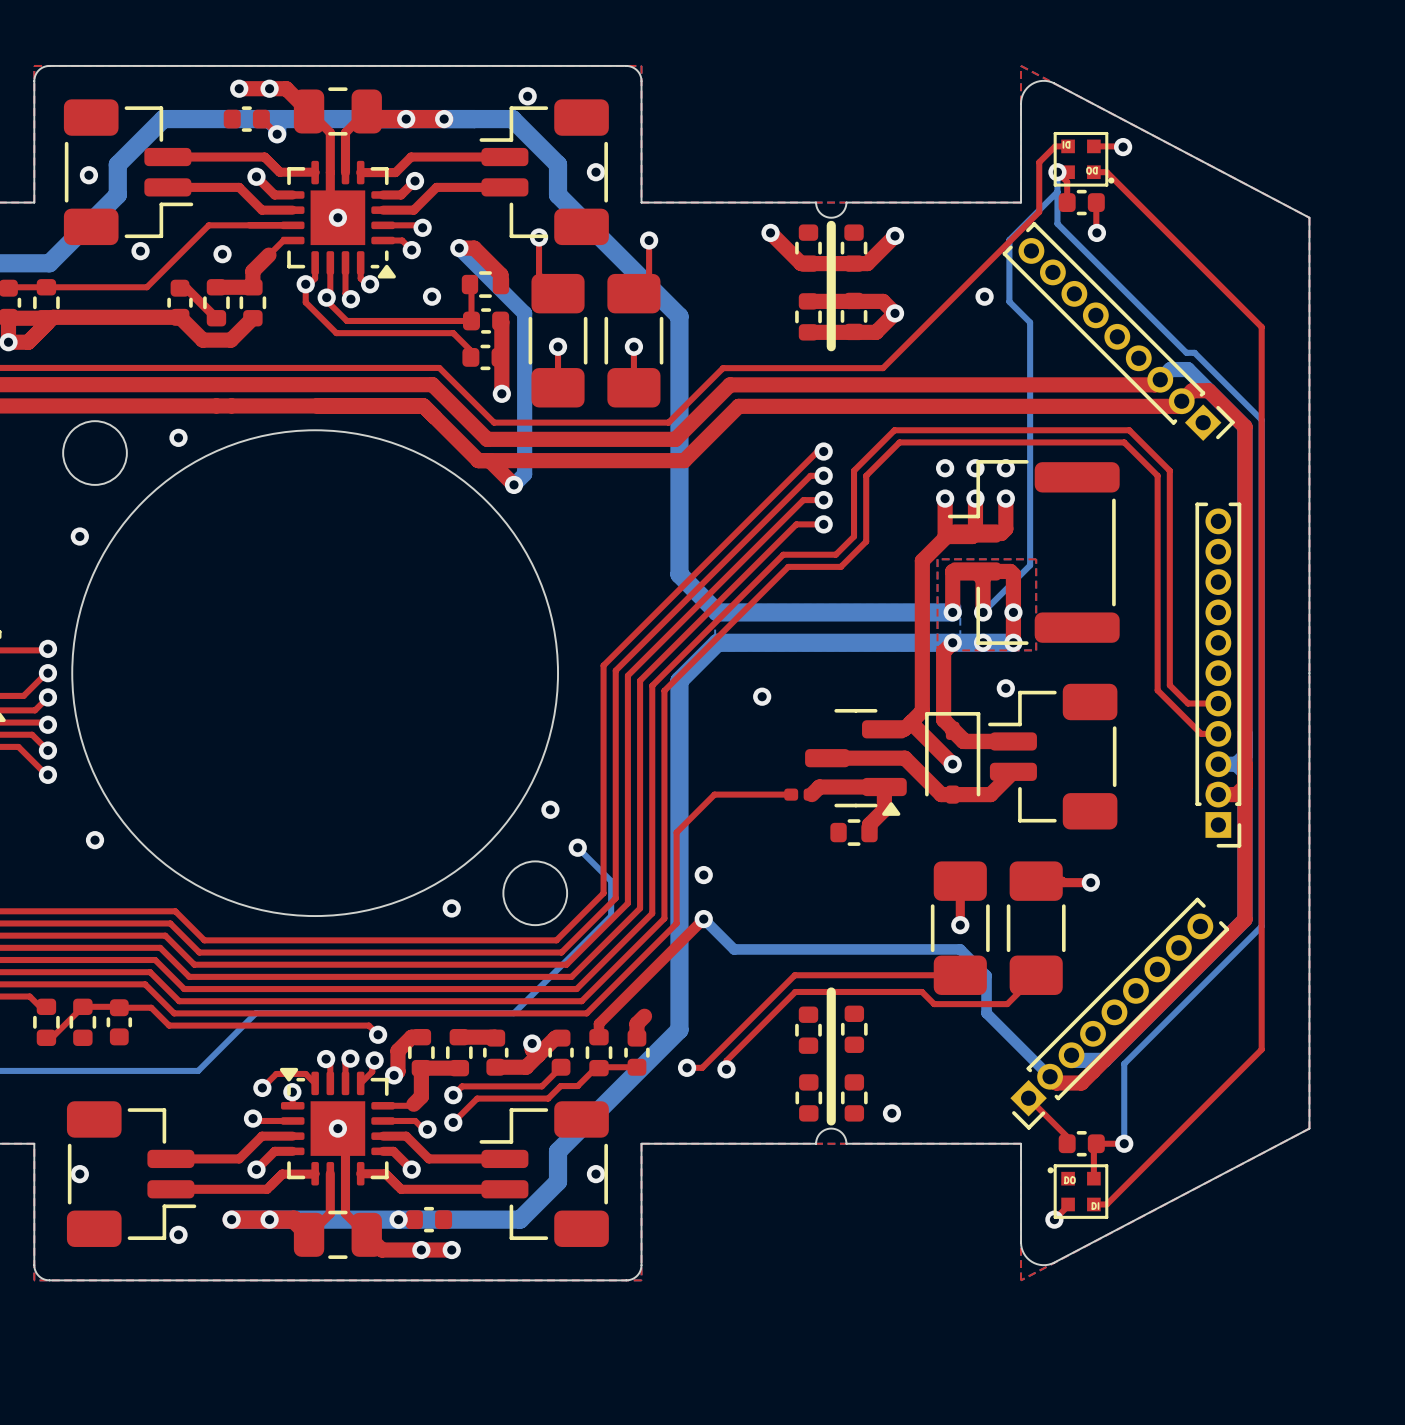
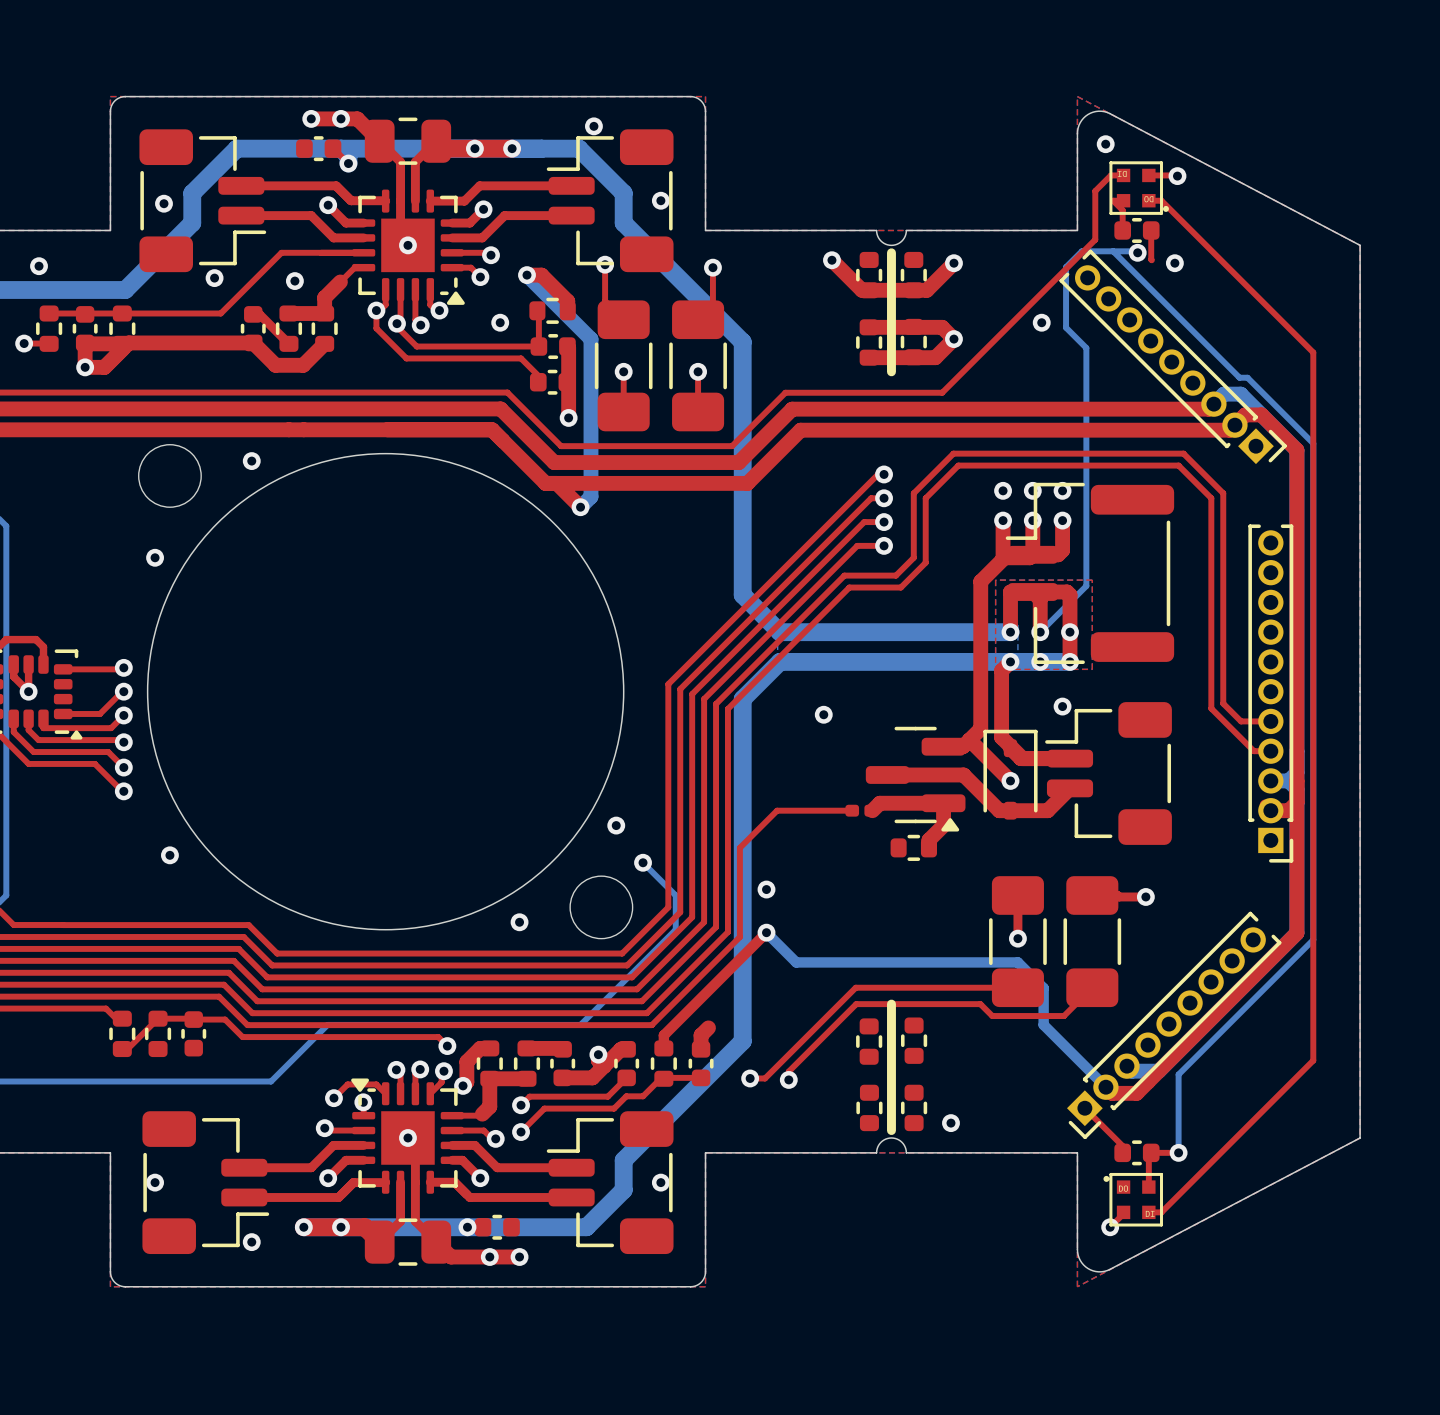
via: none -> (1105, 144)
bottom track: (1057, 172) (1057, 223) -> none
via: (1057, 172) -> none
bottom track: (1057, 191) (1025, 223) -> (1137, 252) (1081, 251)
via position: (1096, 232) -> (1137, 252)
via: none -> (1174, 263)

